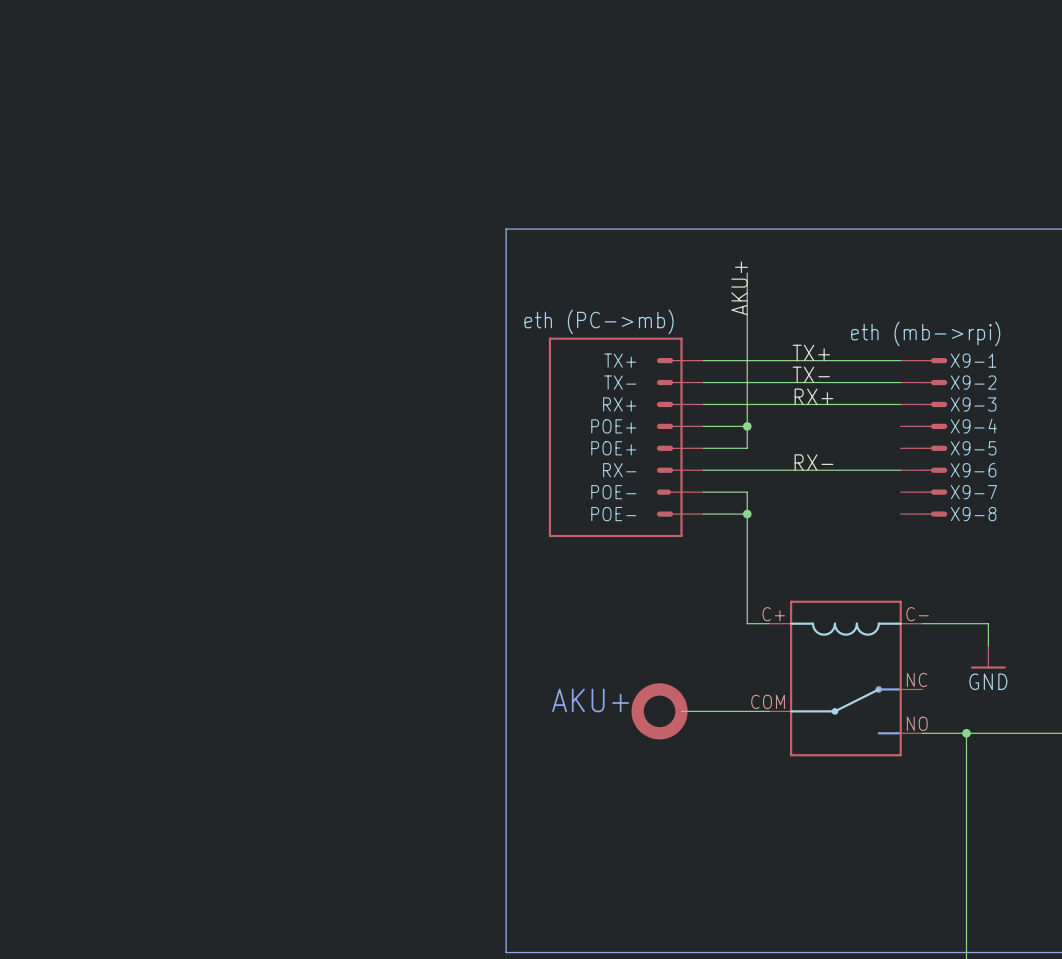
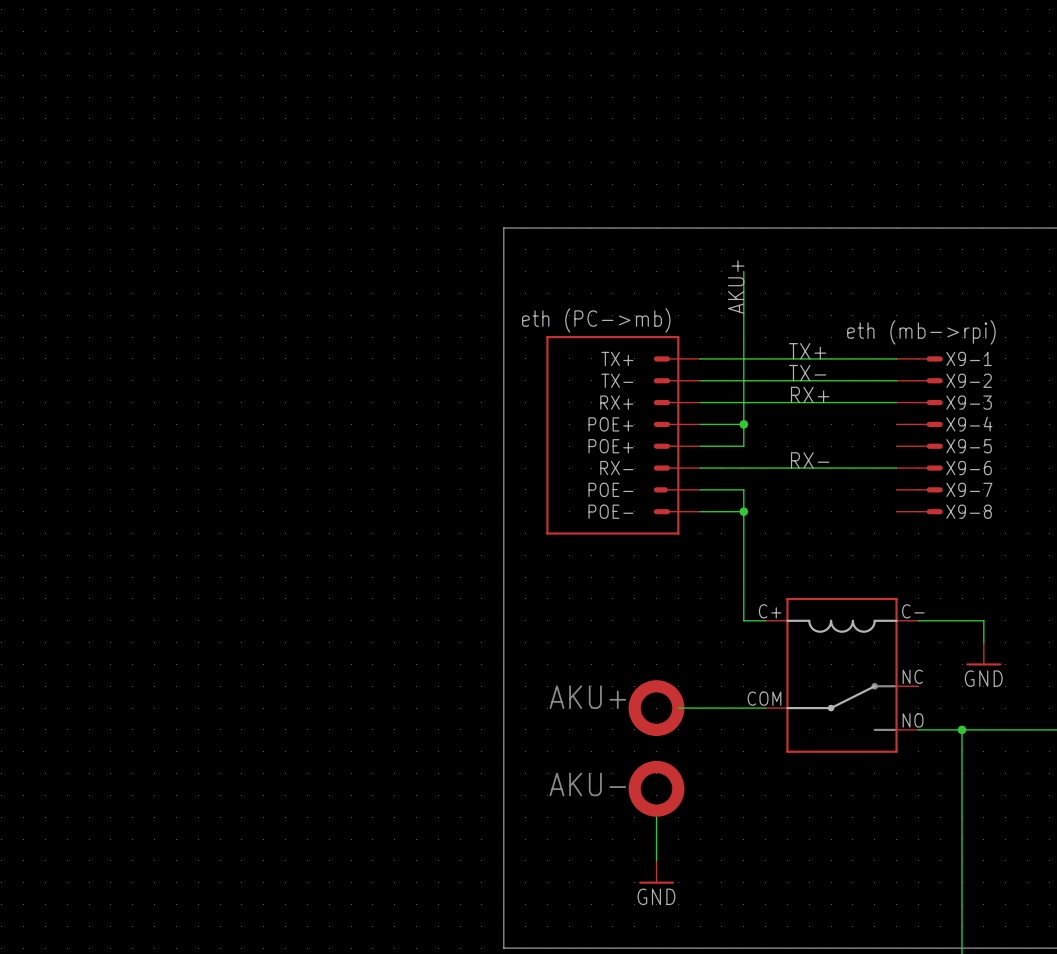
drawing: none -> [628, 760, 685, 817]
text: none -> AKU- (587, 784)
wire: none -> (656, 817) (656, 860)
power symbol: none -> GND (656, 872)

